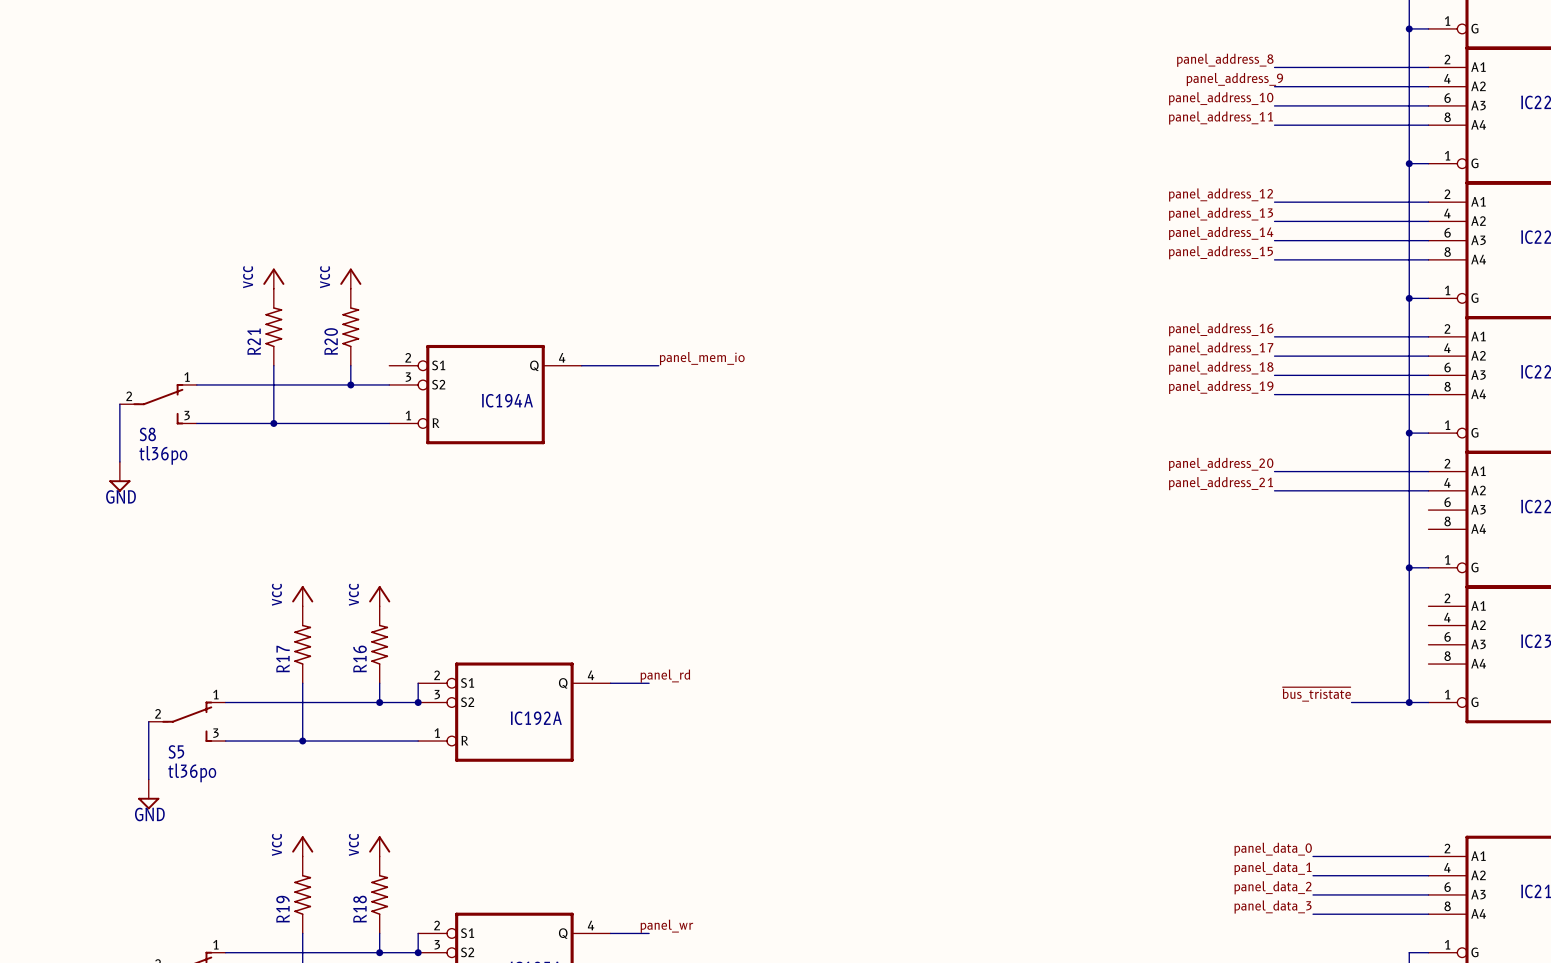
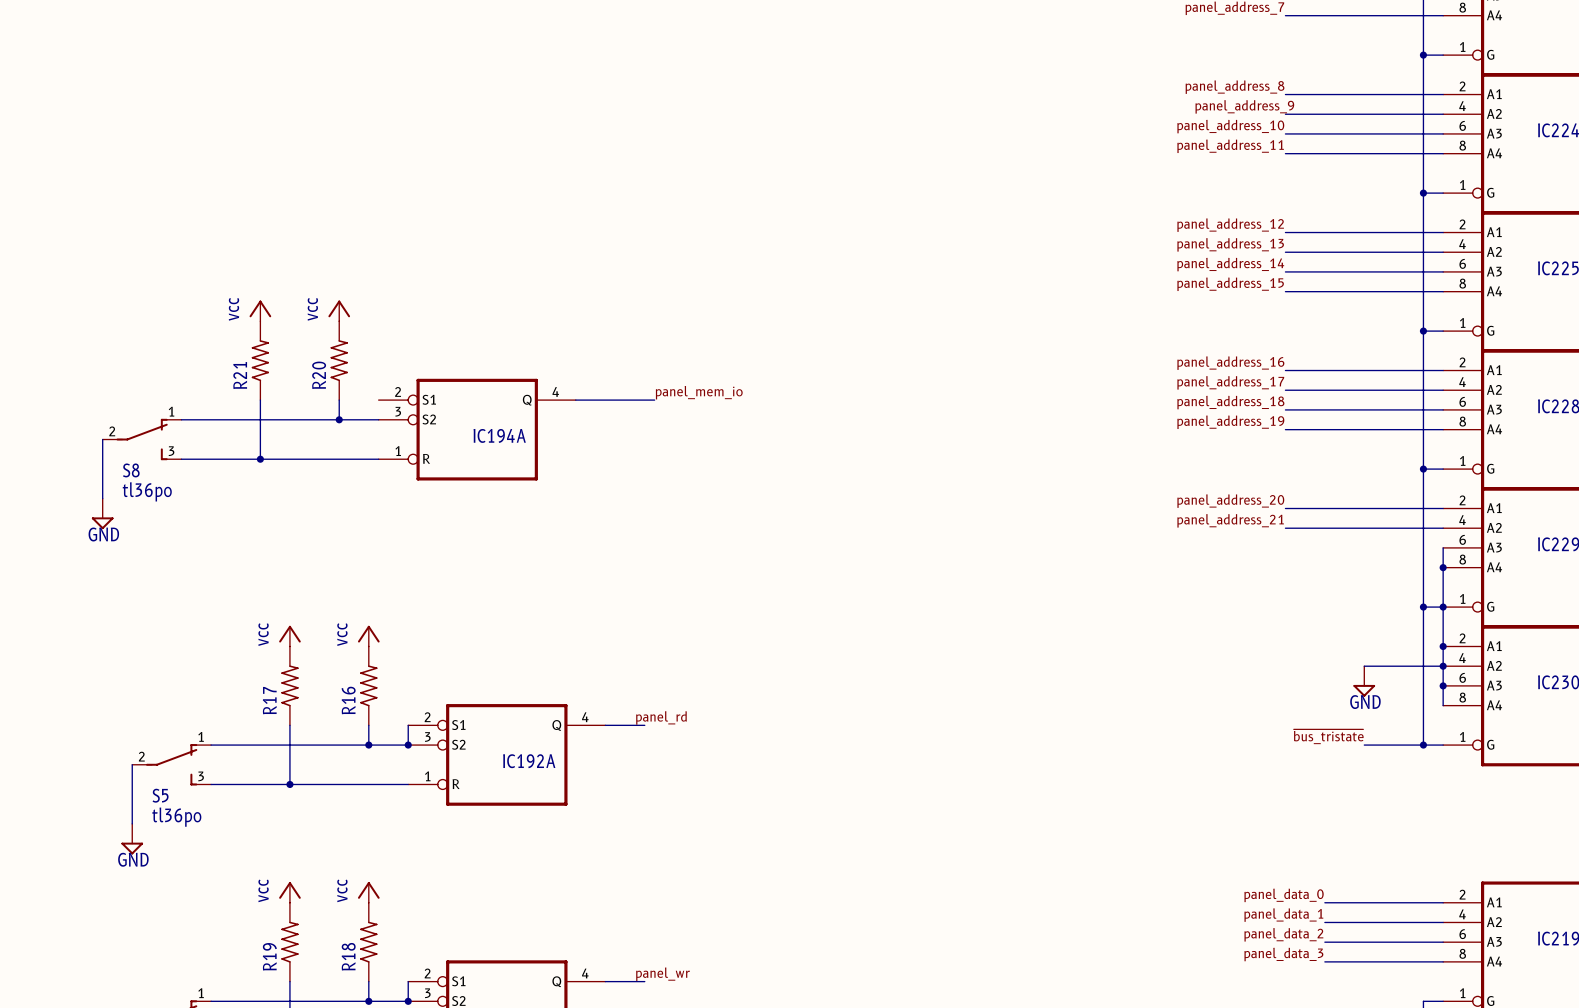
wire: none -> (1443, 547) (1443, 705)
junction: none -> (1443, 567)
junction: none -> (1443, 607)
junction: none -> (1443, 646)
wire: none -> (1364, 666) (1443, 666)
junction: none -> (1443, 666)
power symbol: none -> GND (1364, 681)
junction: none -> (1443, 685)

